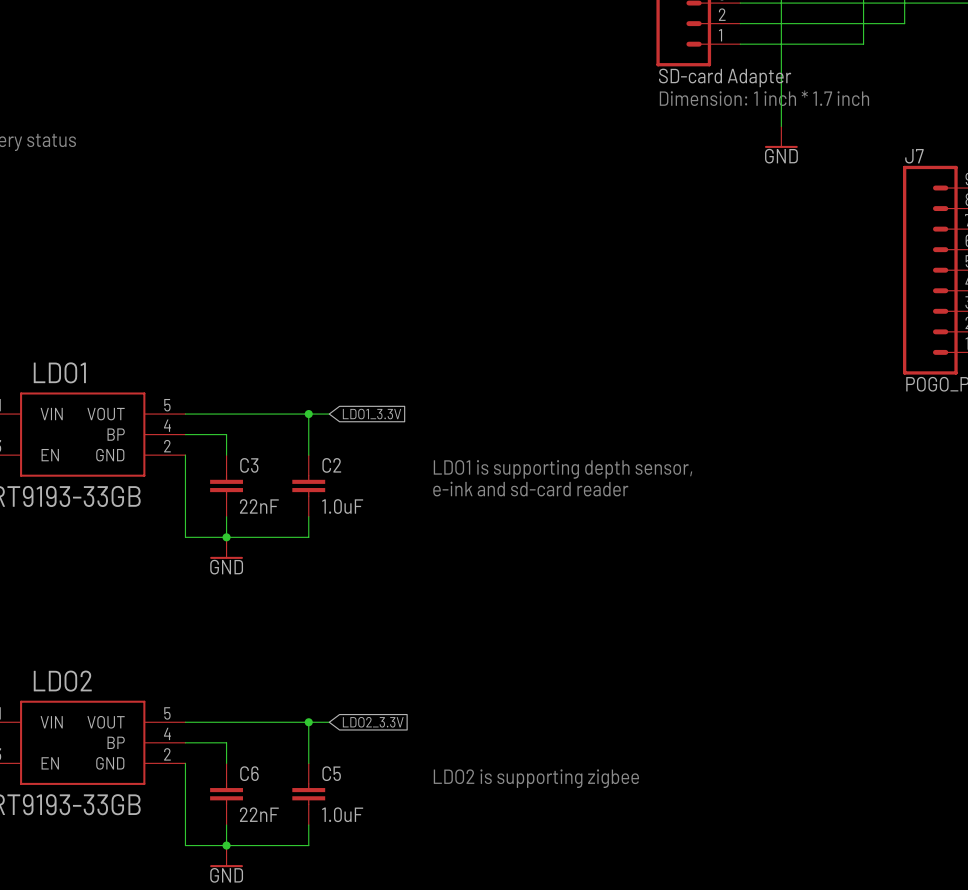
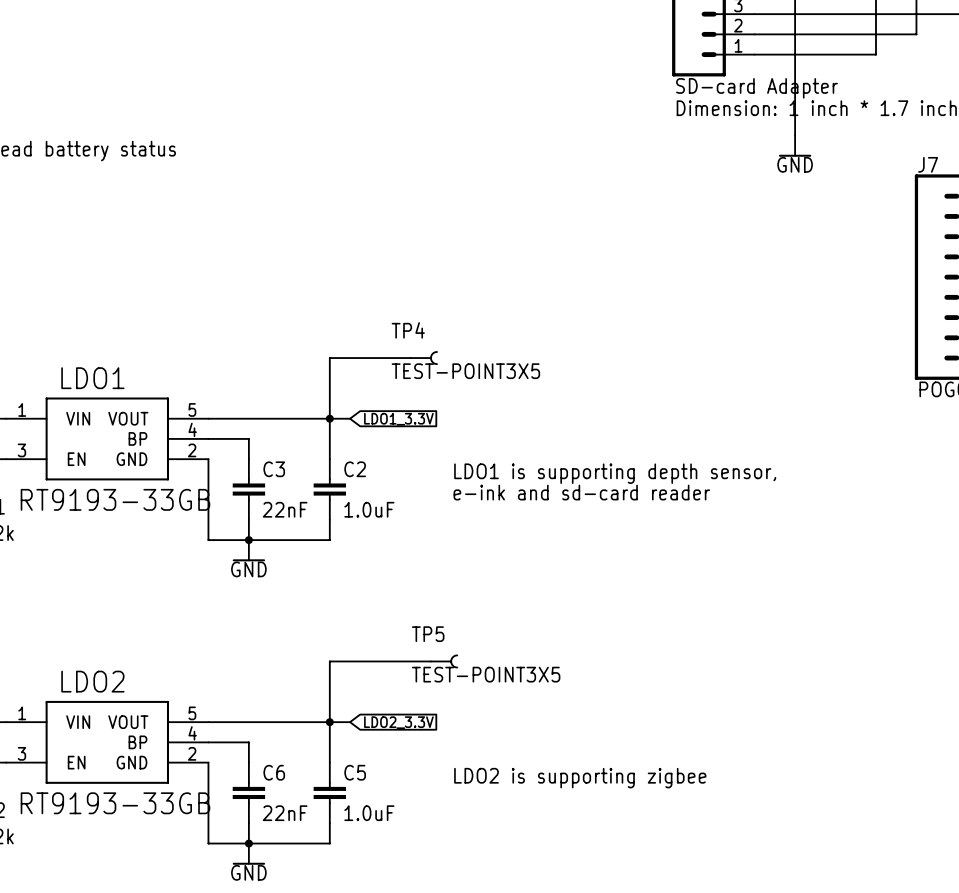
wire: none -> (410, 358) (329, 358) (329, 418)
TP4: none -> TEST-POINT3X5 (423, 358)
wire: none -> (430, 661) (329, 661) (329, 722)
TP5: none -> TEST-POINT3X5 (444, 661)

